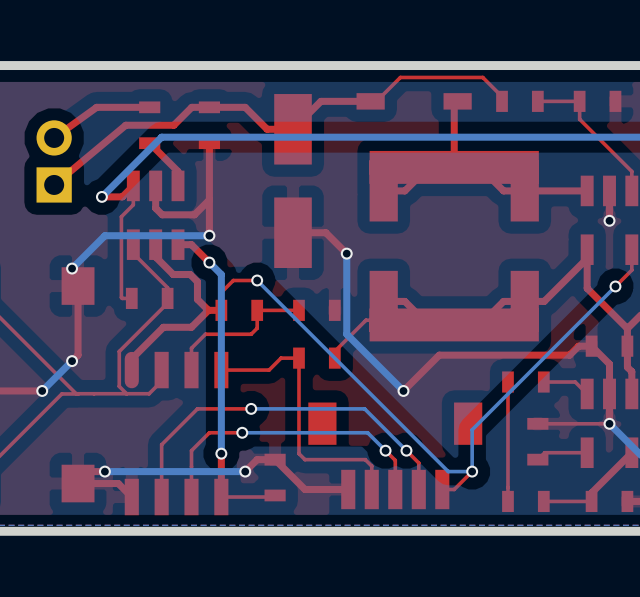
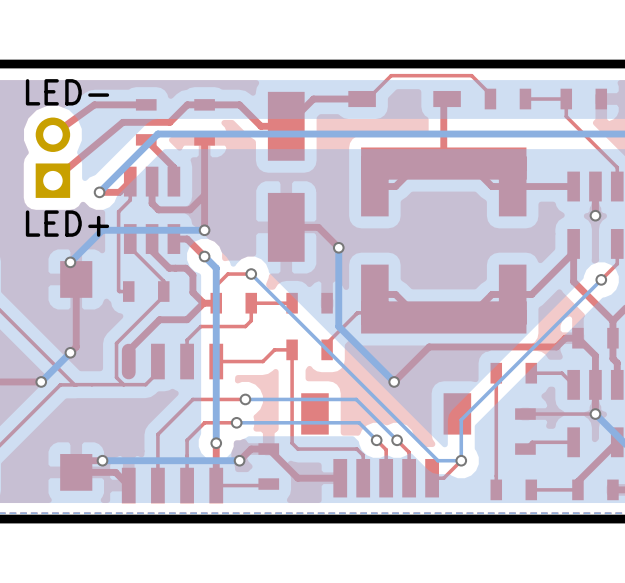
text: none -> LED- (67, 92)
text: none -> LED+ (67, 223)

